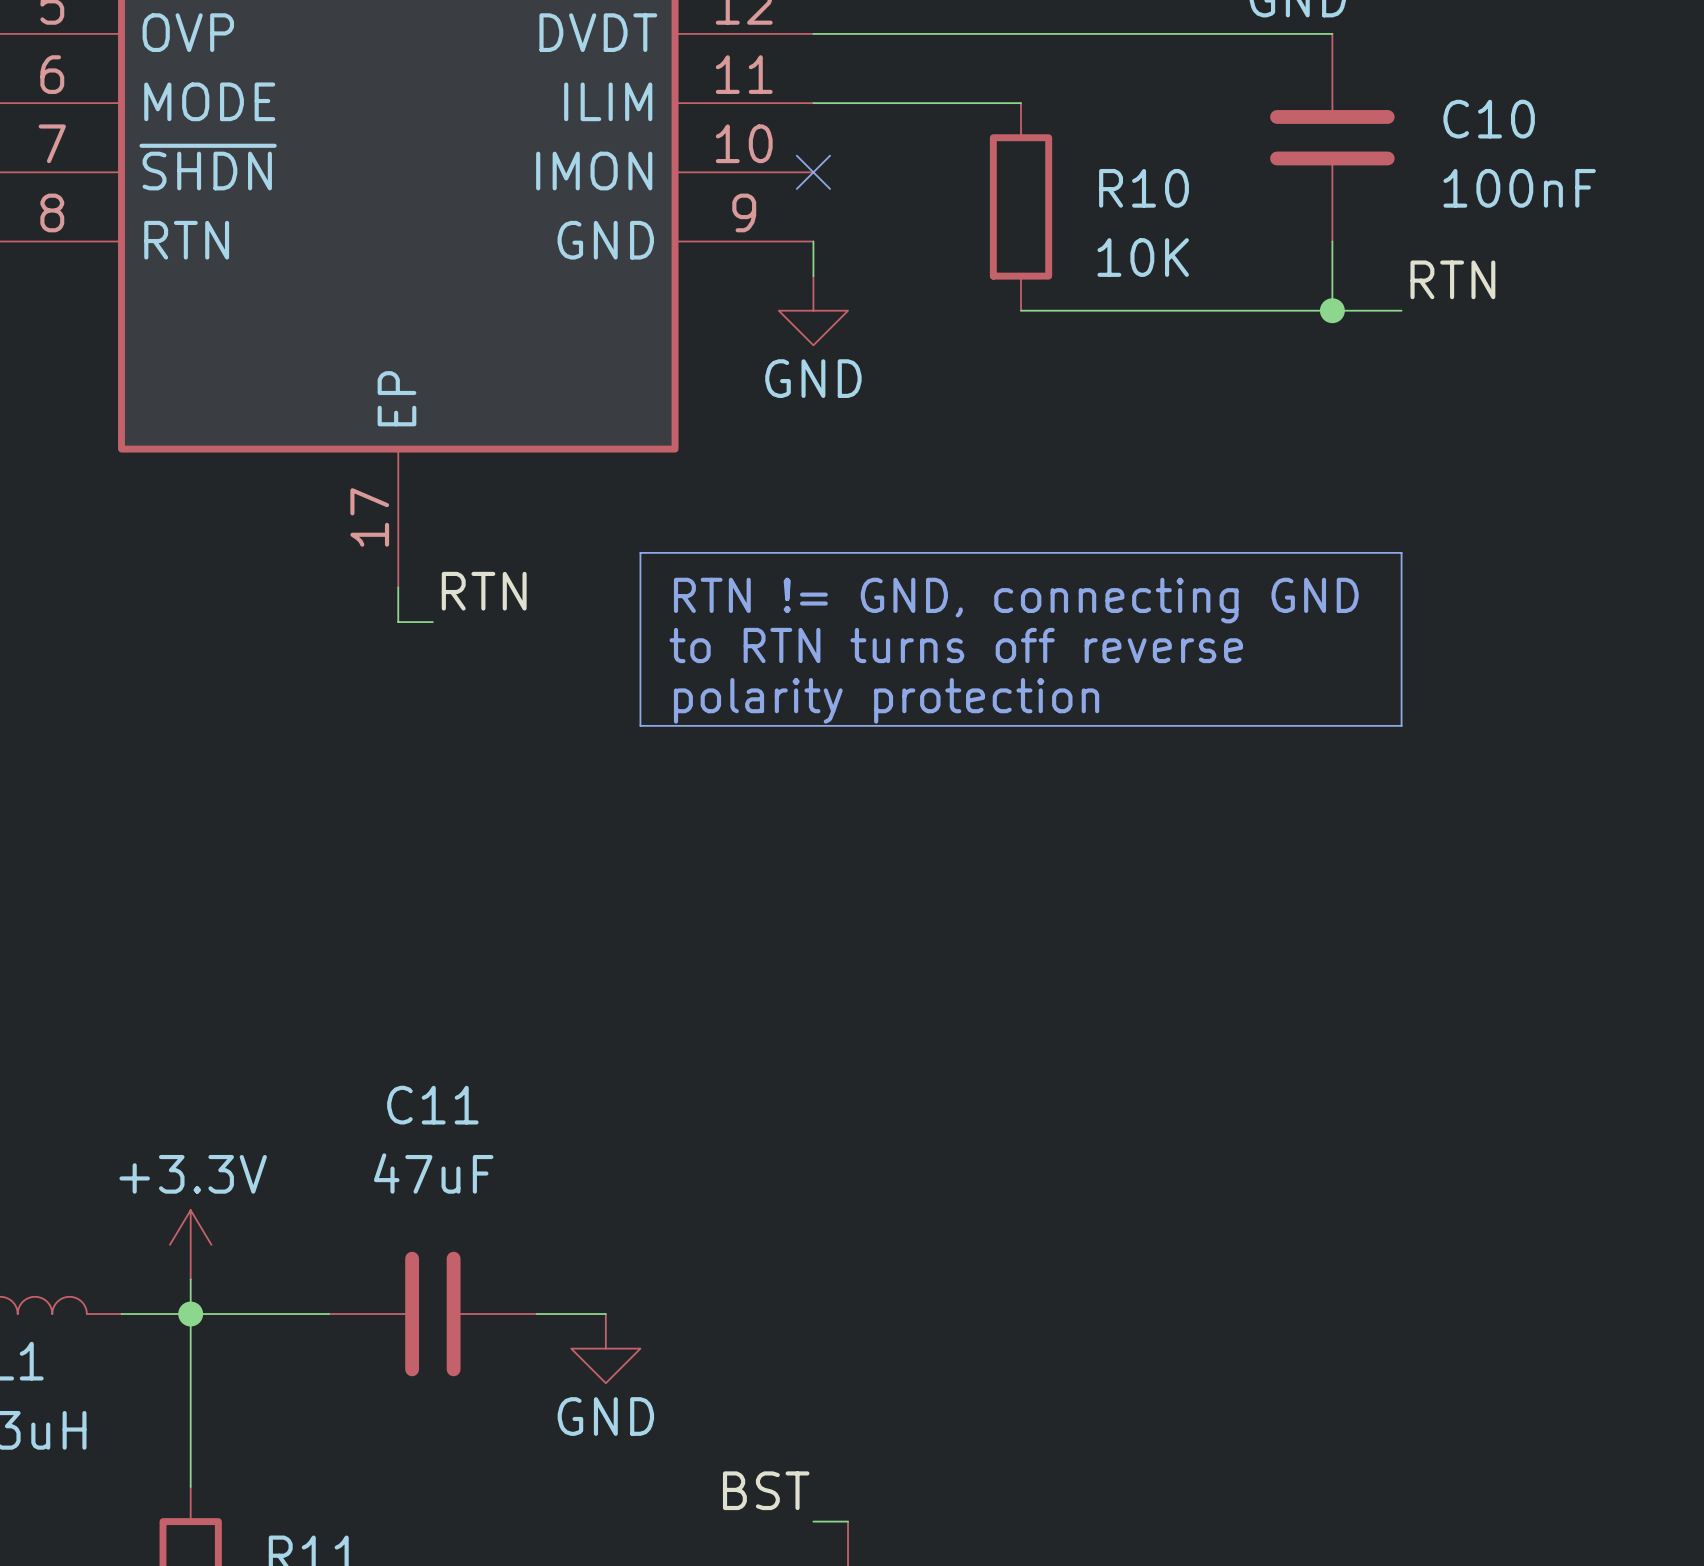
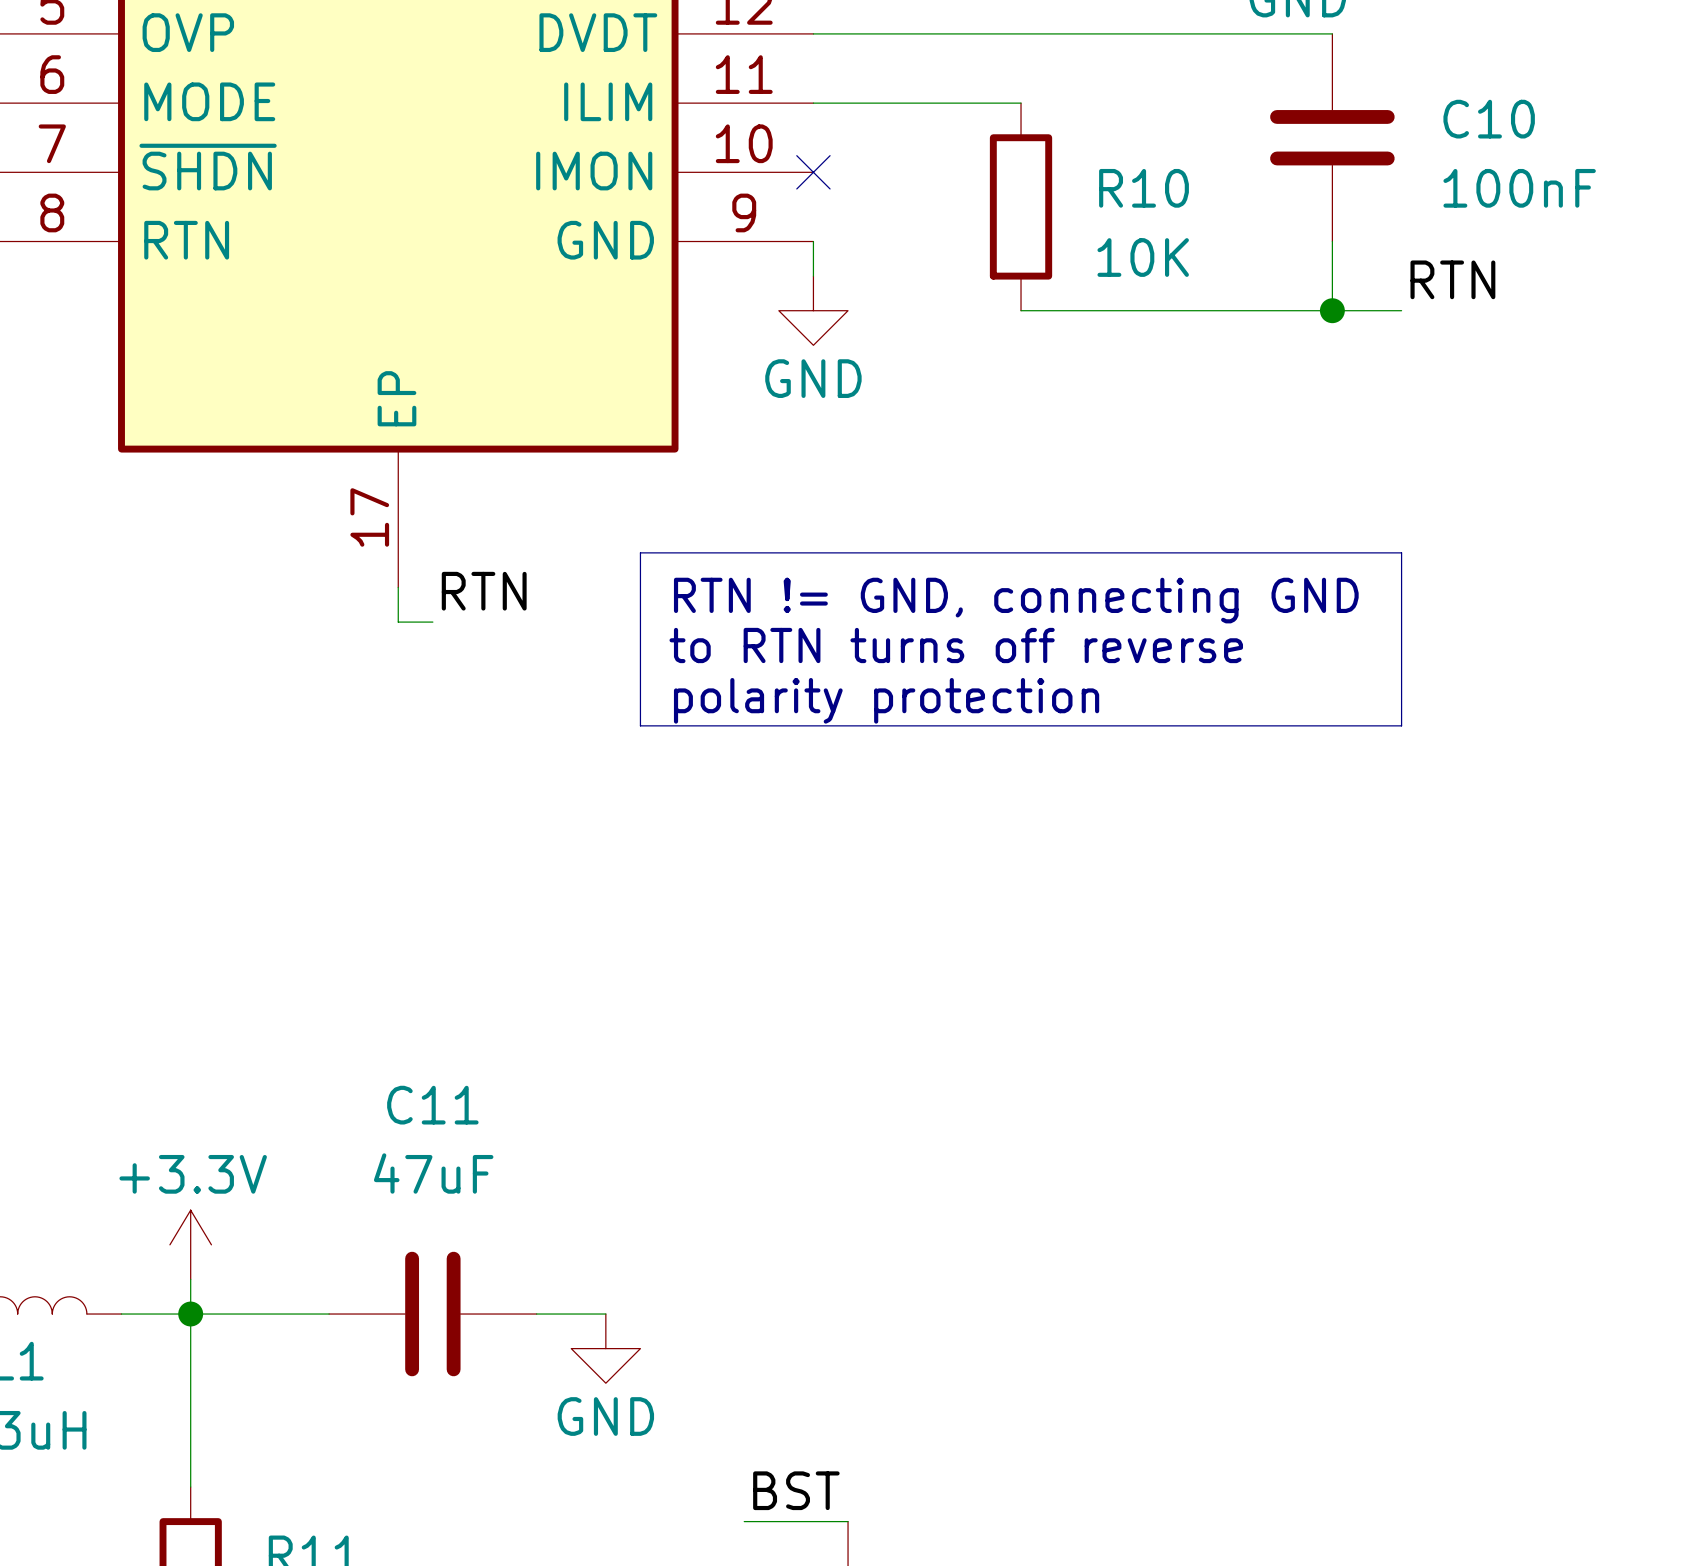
label position: BST (766, 1490) -> BST (796, 1490)
wire: none -> (744, 1521) (813, 1521)

